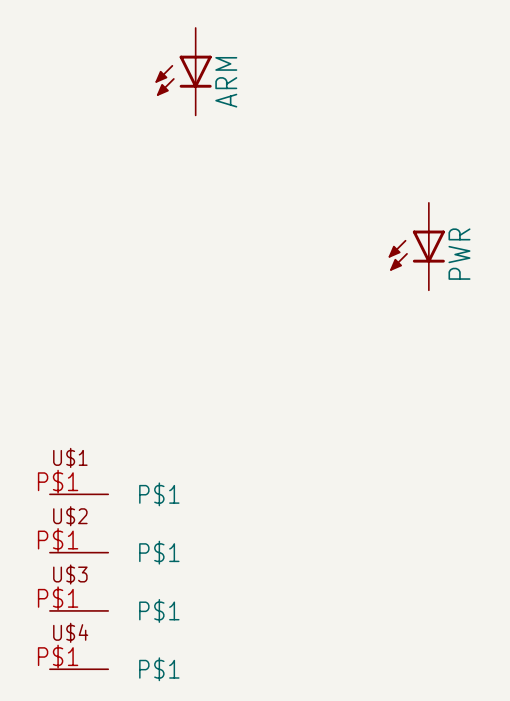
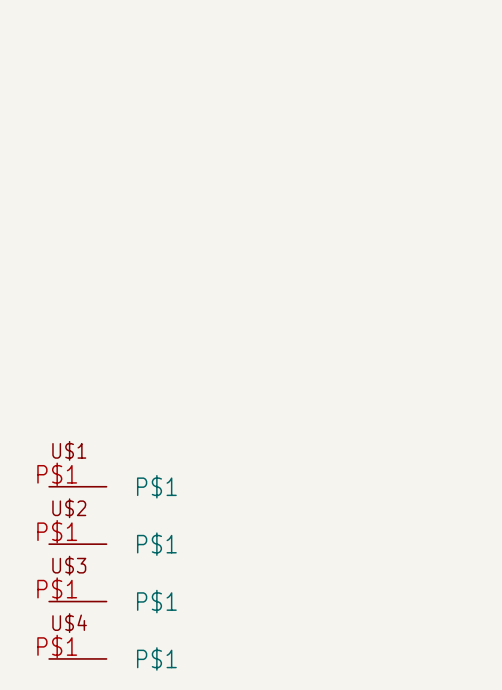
ARM: (183, 71) -> none
PWR: (416, 246) -> none

